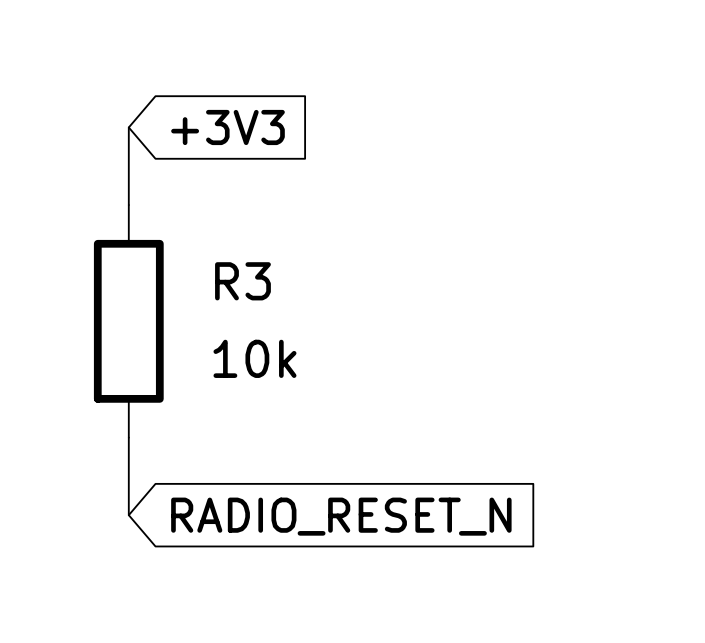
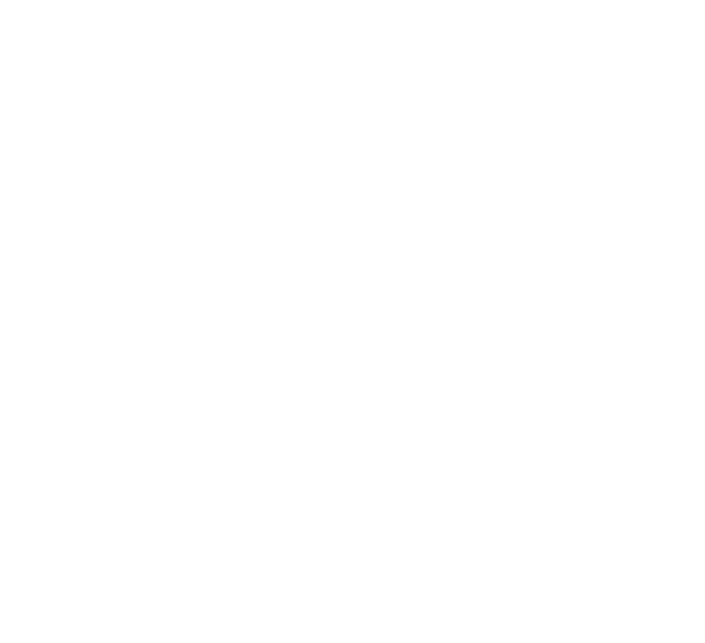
wire: (128, 127) (128, 205) -> none
global label: +3V3 (227, 127) -> none
R3: 10k (128, 321) -> none
wire: (128, 437) (128, 515) -> none
global label: RADIO_RESET_N (341, 516) -> none

